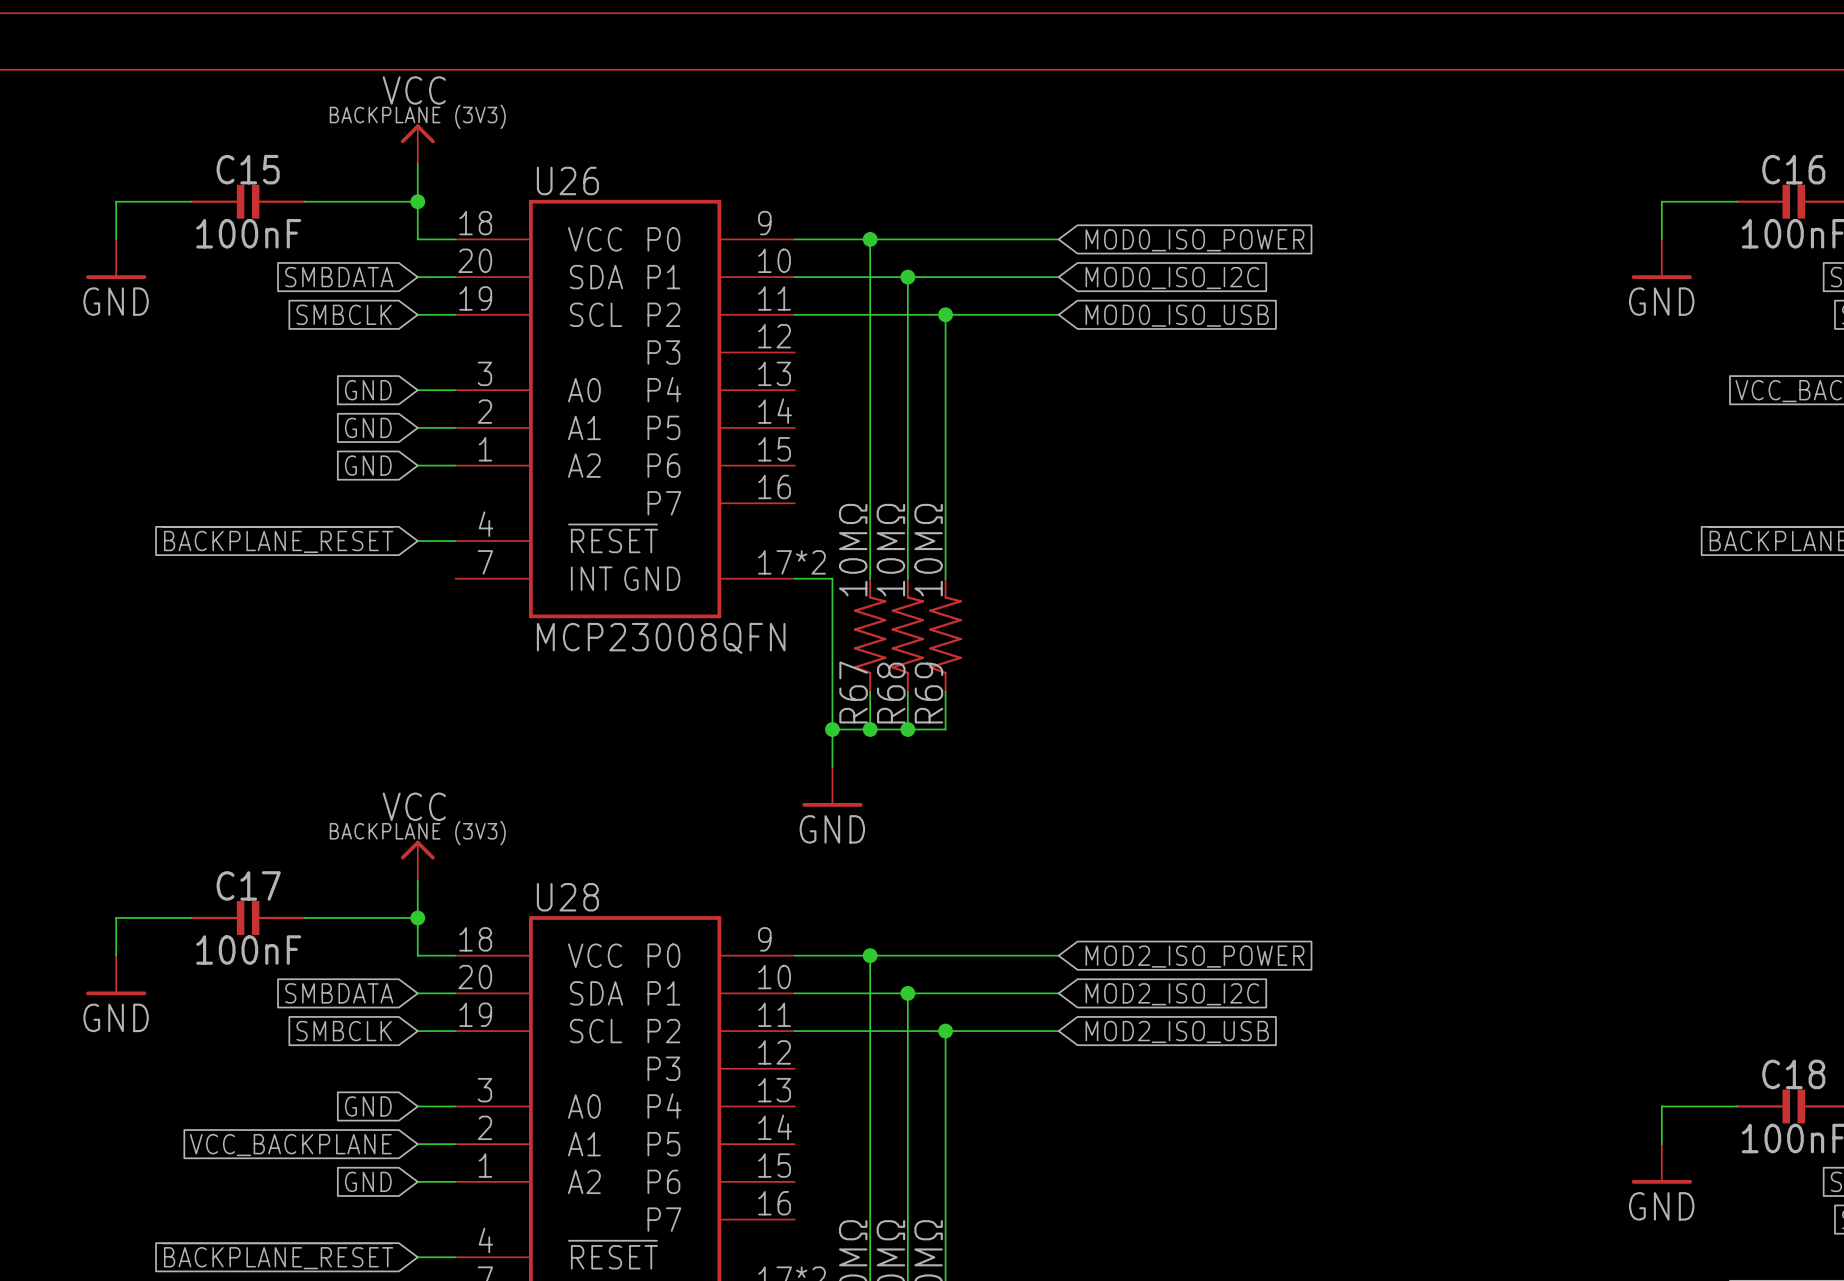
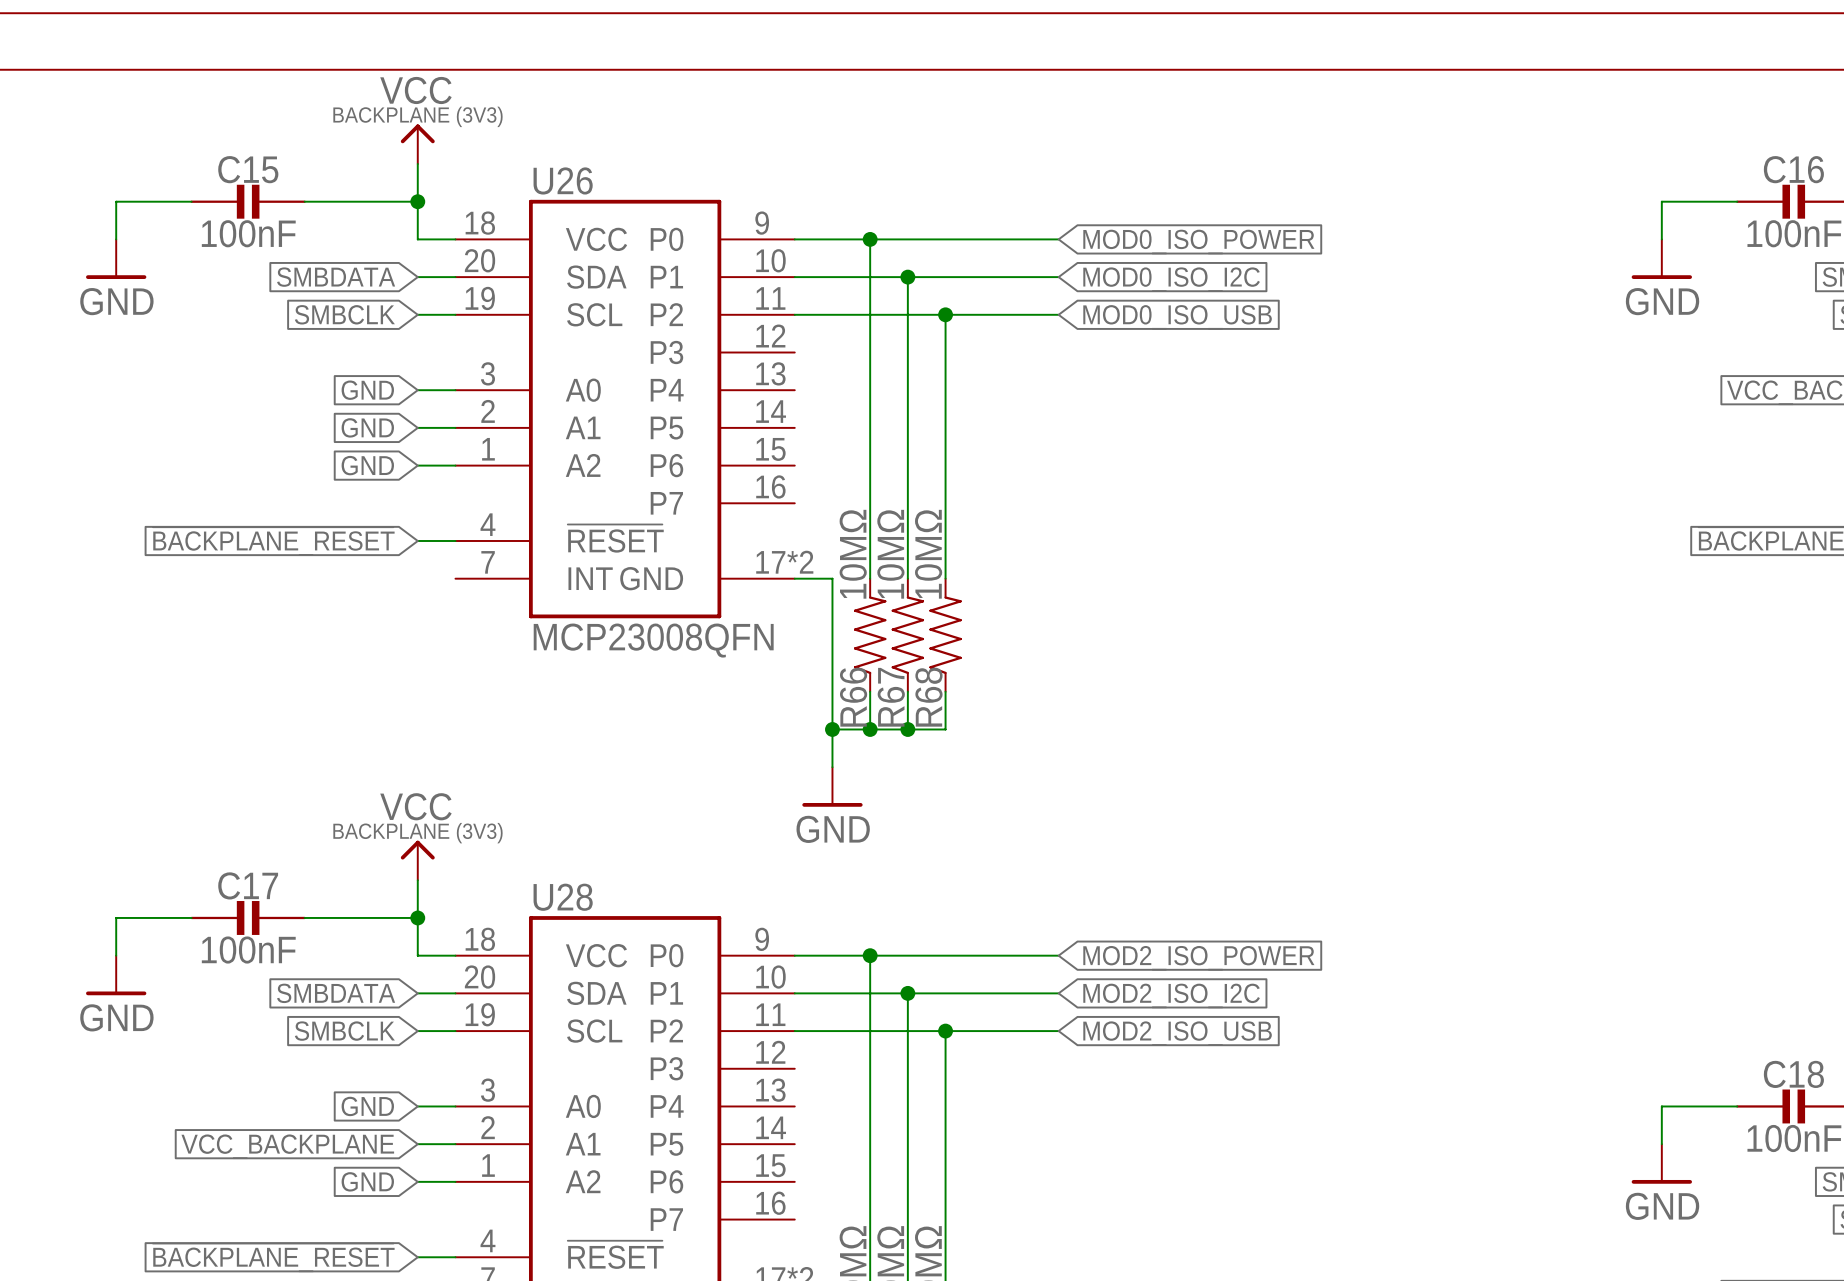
R67 name: R67 (853, 692) -> R66 (853, 697)
R68 name: R68 (891, 693) -> R67 (891, 697)
R69 name: R69 (928, 693) -> R68 (928, 697)

